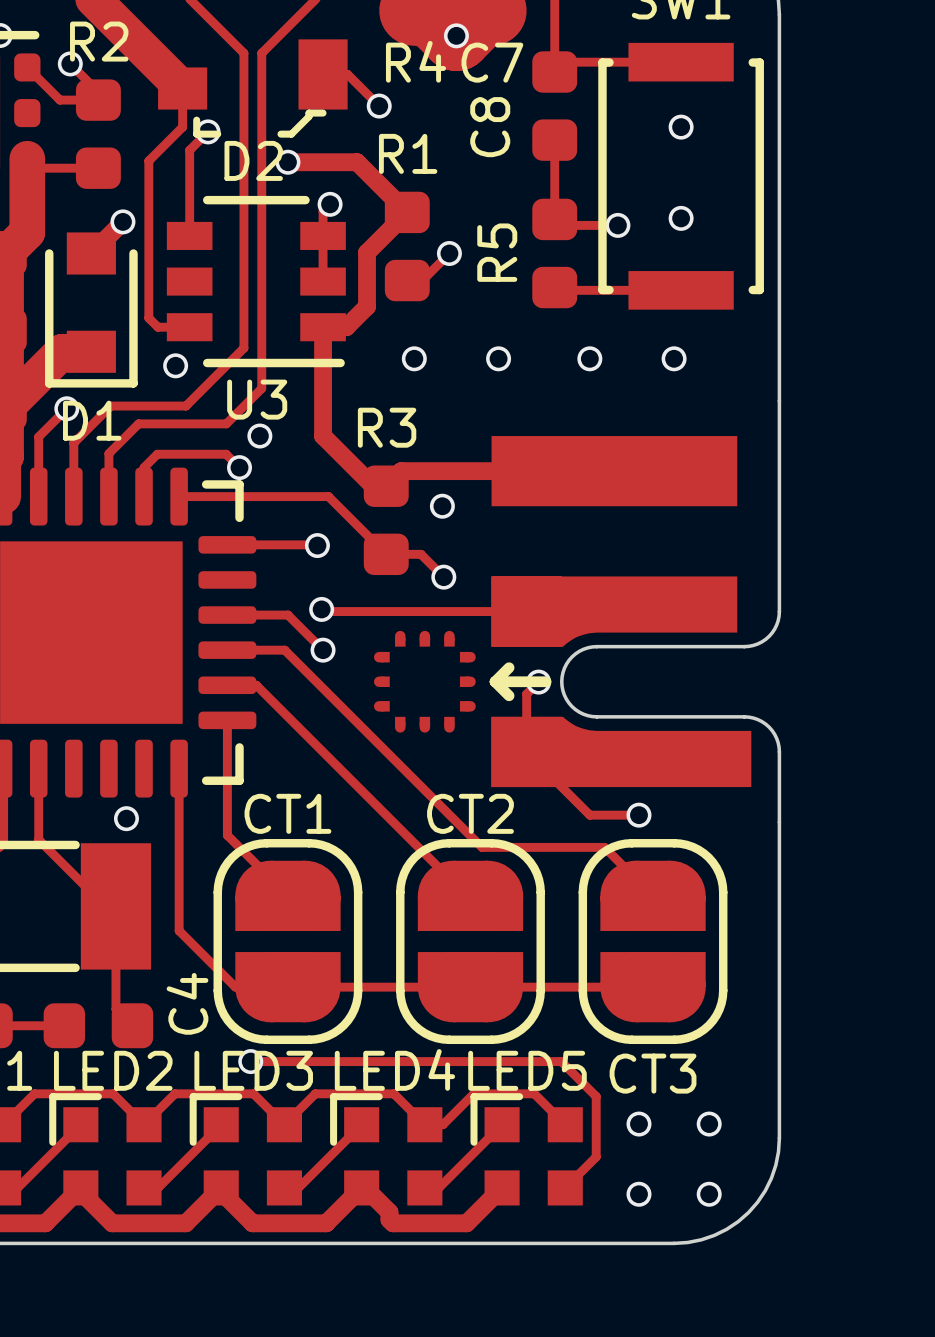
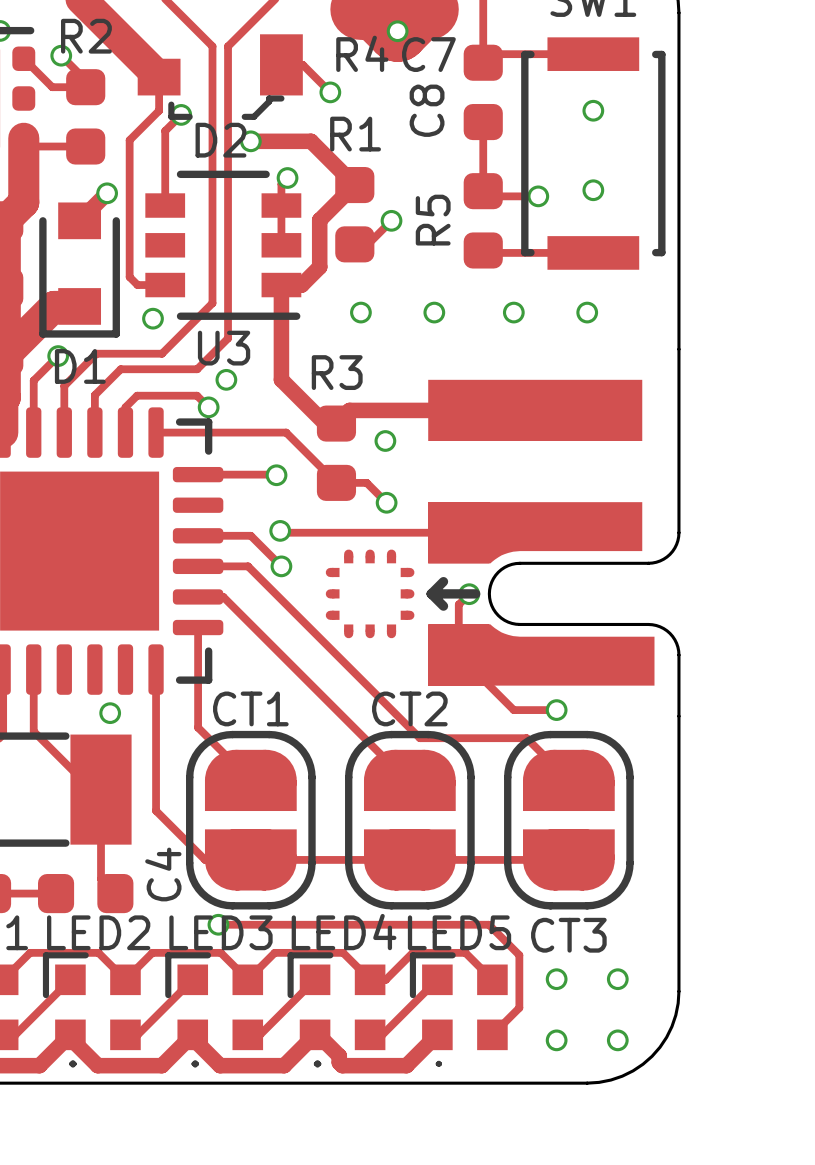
LED2 text: none -> · (72, 1063)
LED3 text: none -> · (195, 1063)
LED4 text: none -> · (317, 1063)
LED5 text: none -> · (438, 1063)

